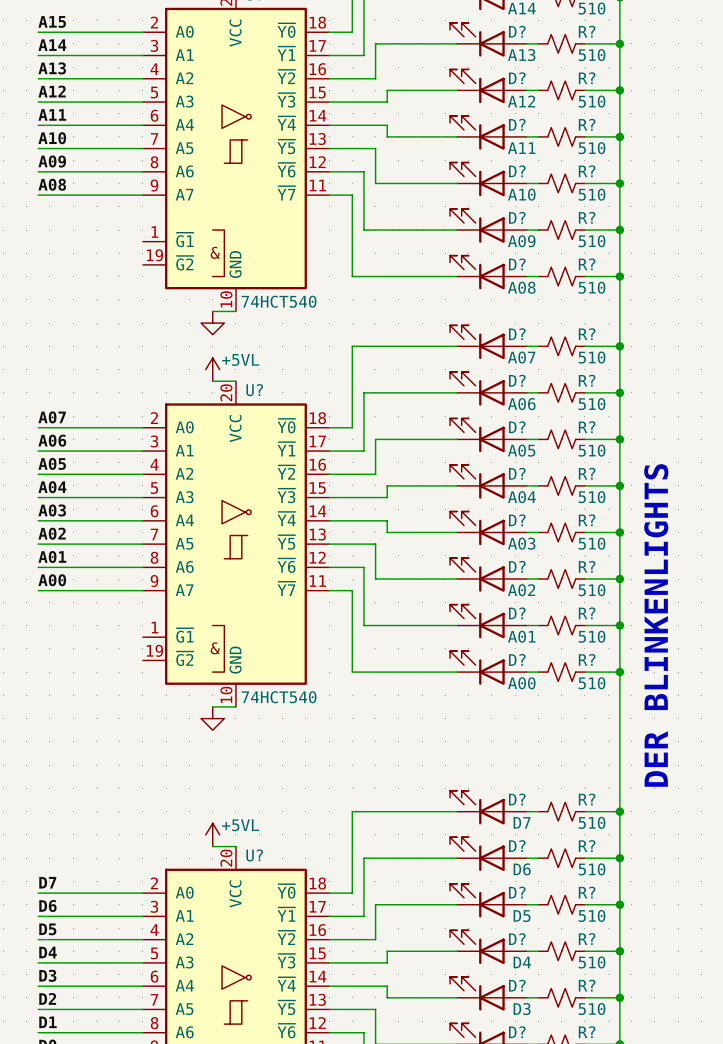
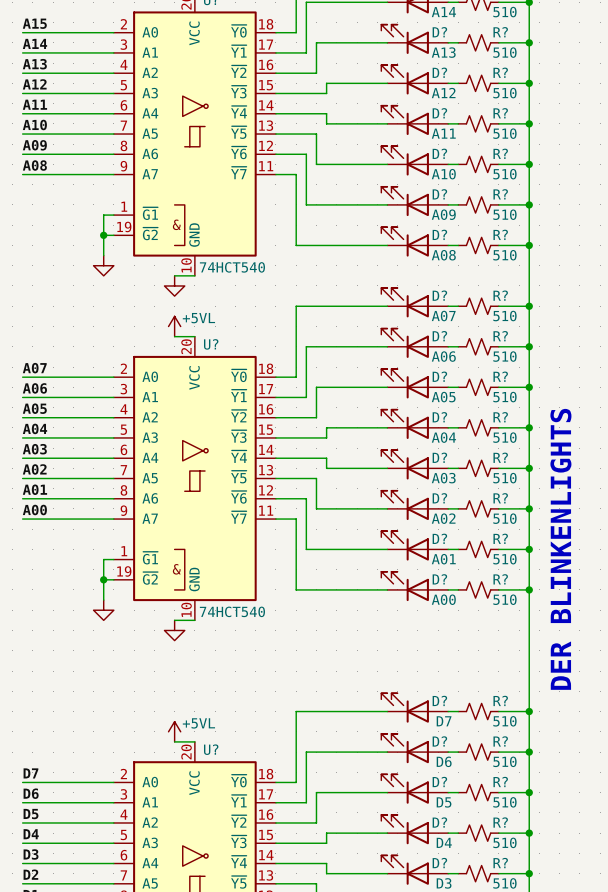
wire: none -> (113, 215) (103, 215) (103, 255)
wire: none -> (103, 235) (113, 235)
junction: none -> (103, 235)
power symbol: none -> (103, 265)
wire: none -> (113, 559) (103, 559) (103, 600)
wire: none -> (103, 579) (113, 579)
junction: none -> (103, 579)
power symbol: none -> (103, 610)

